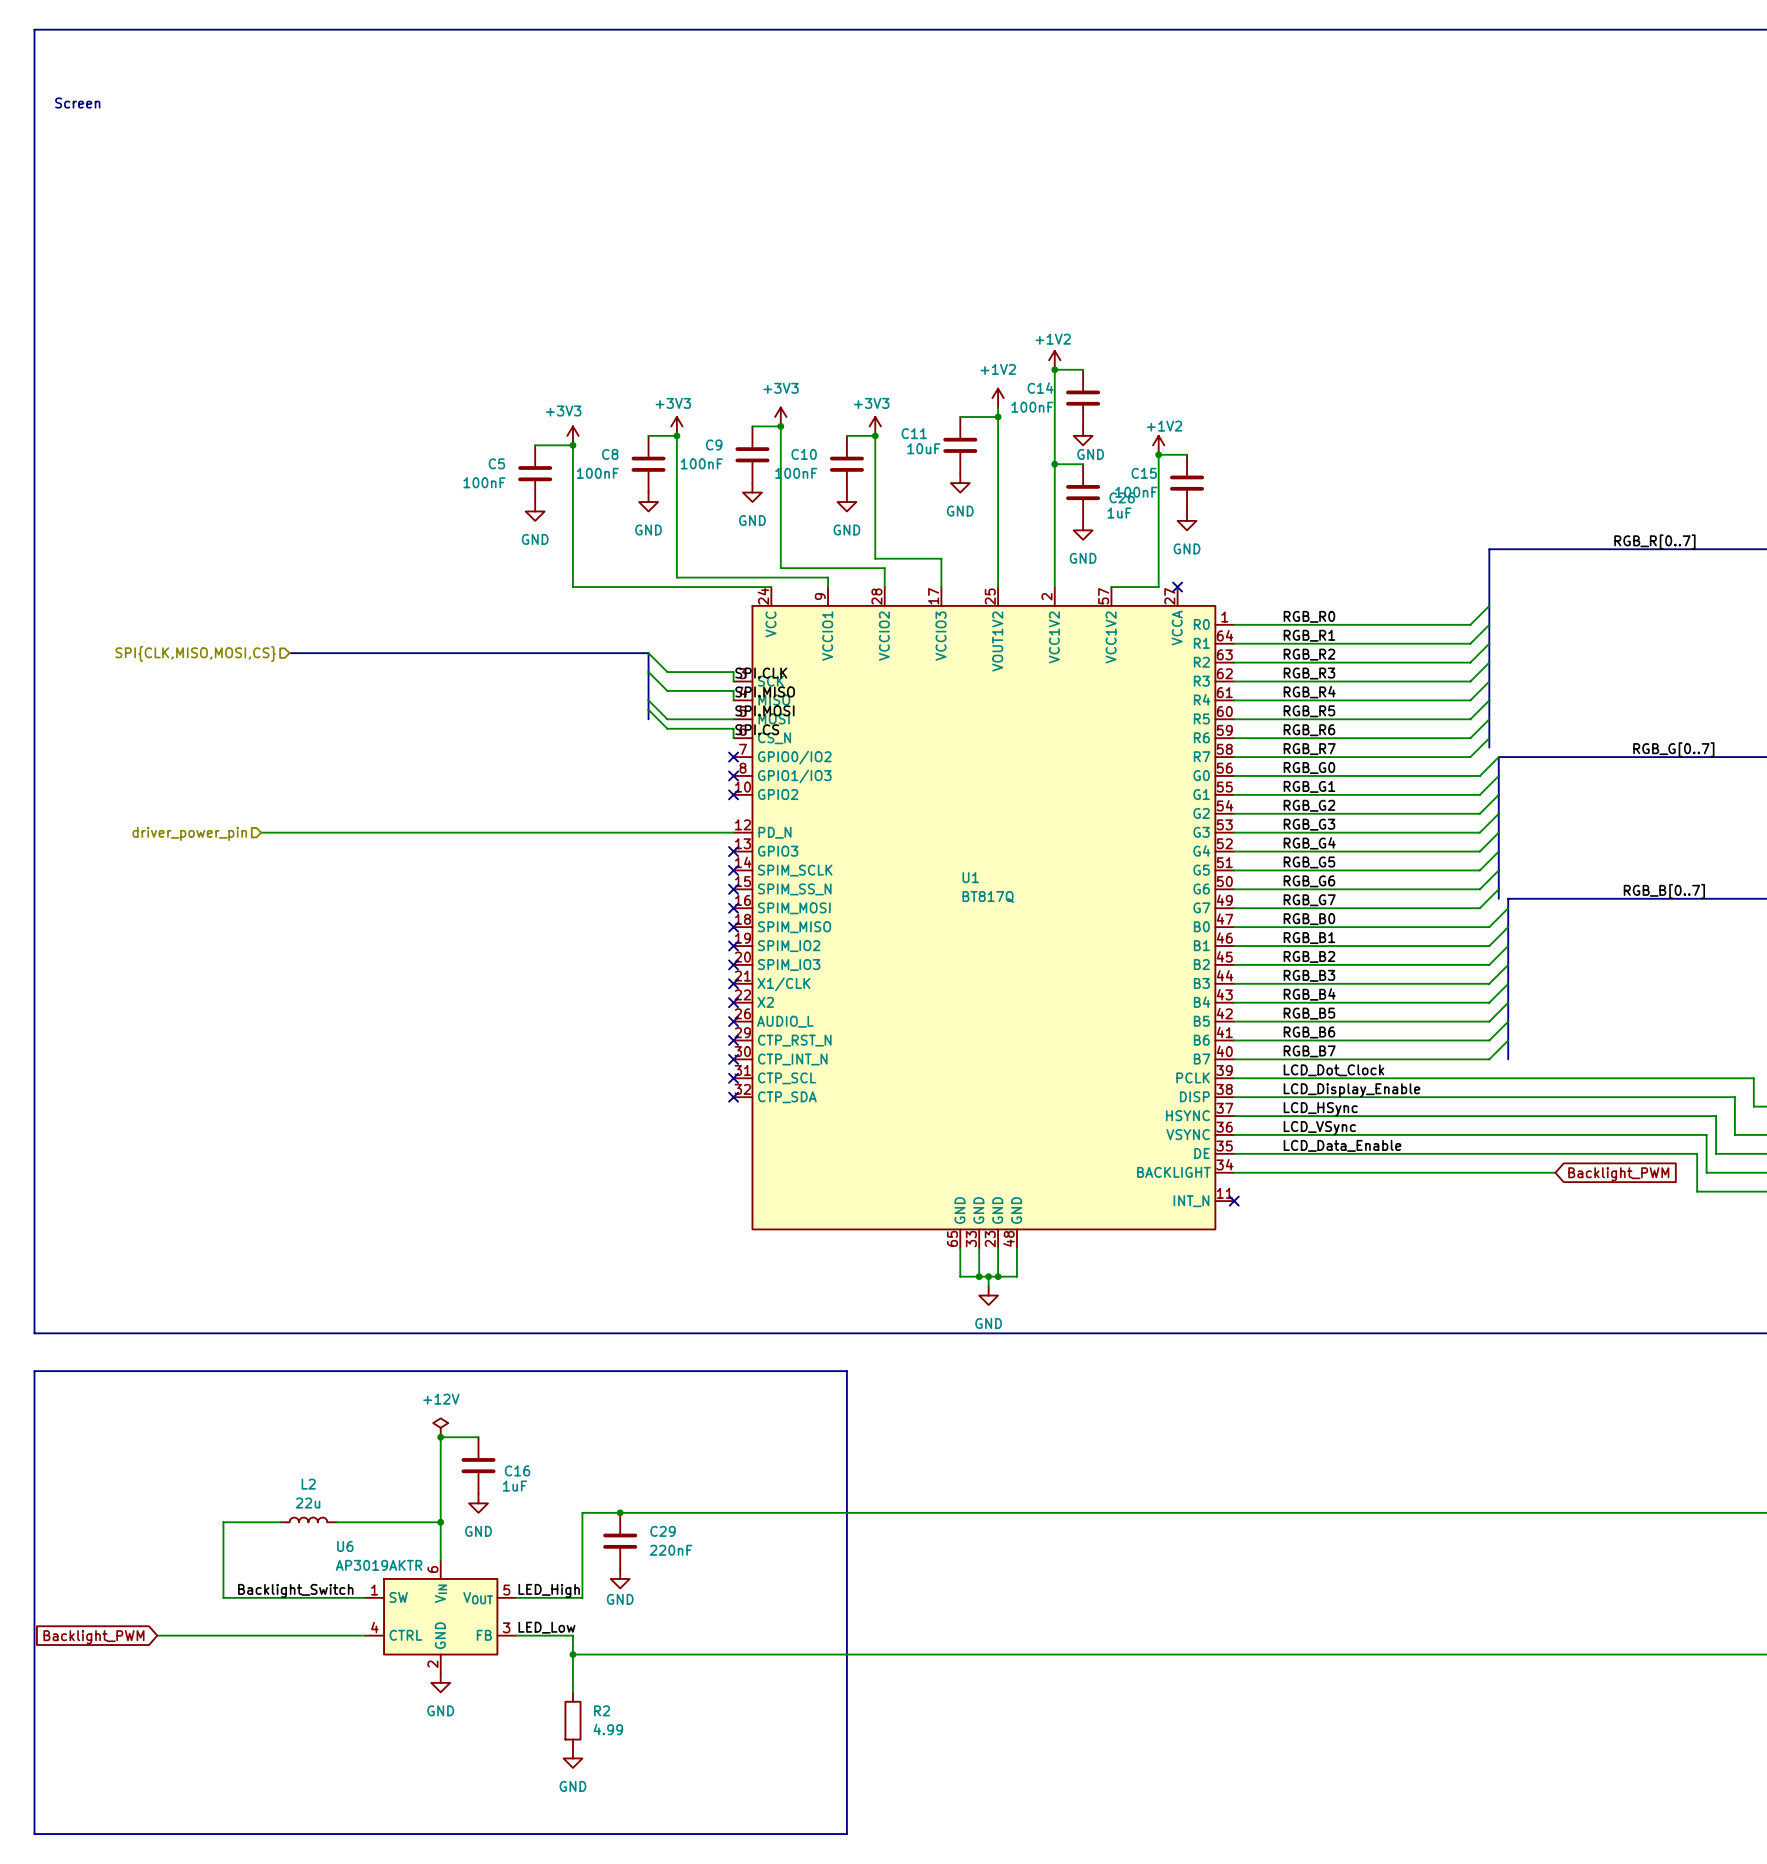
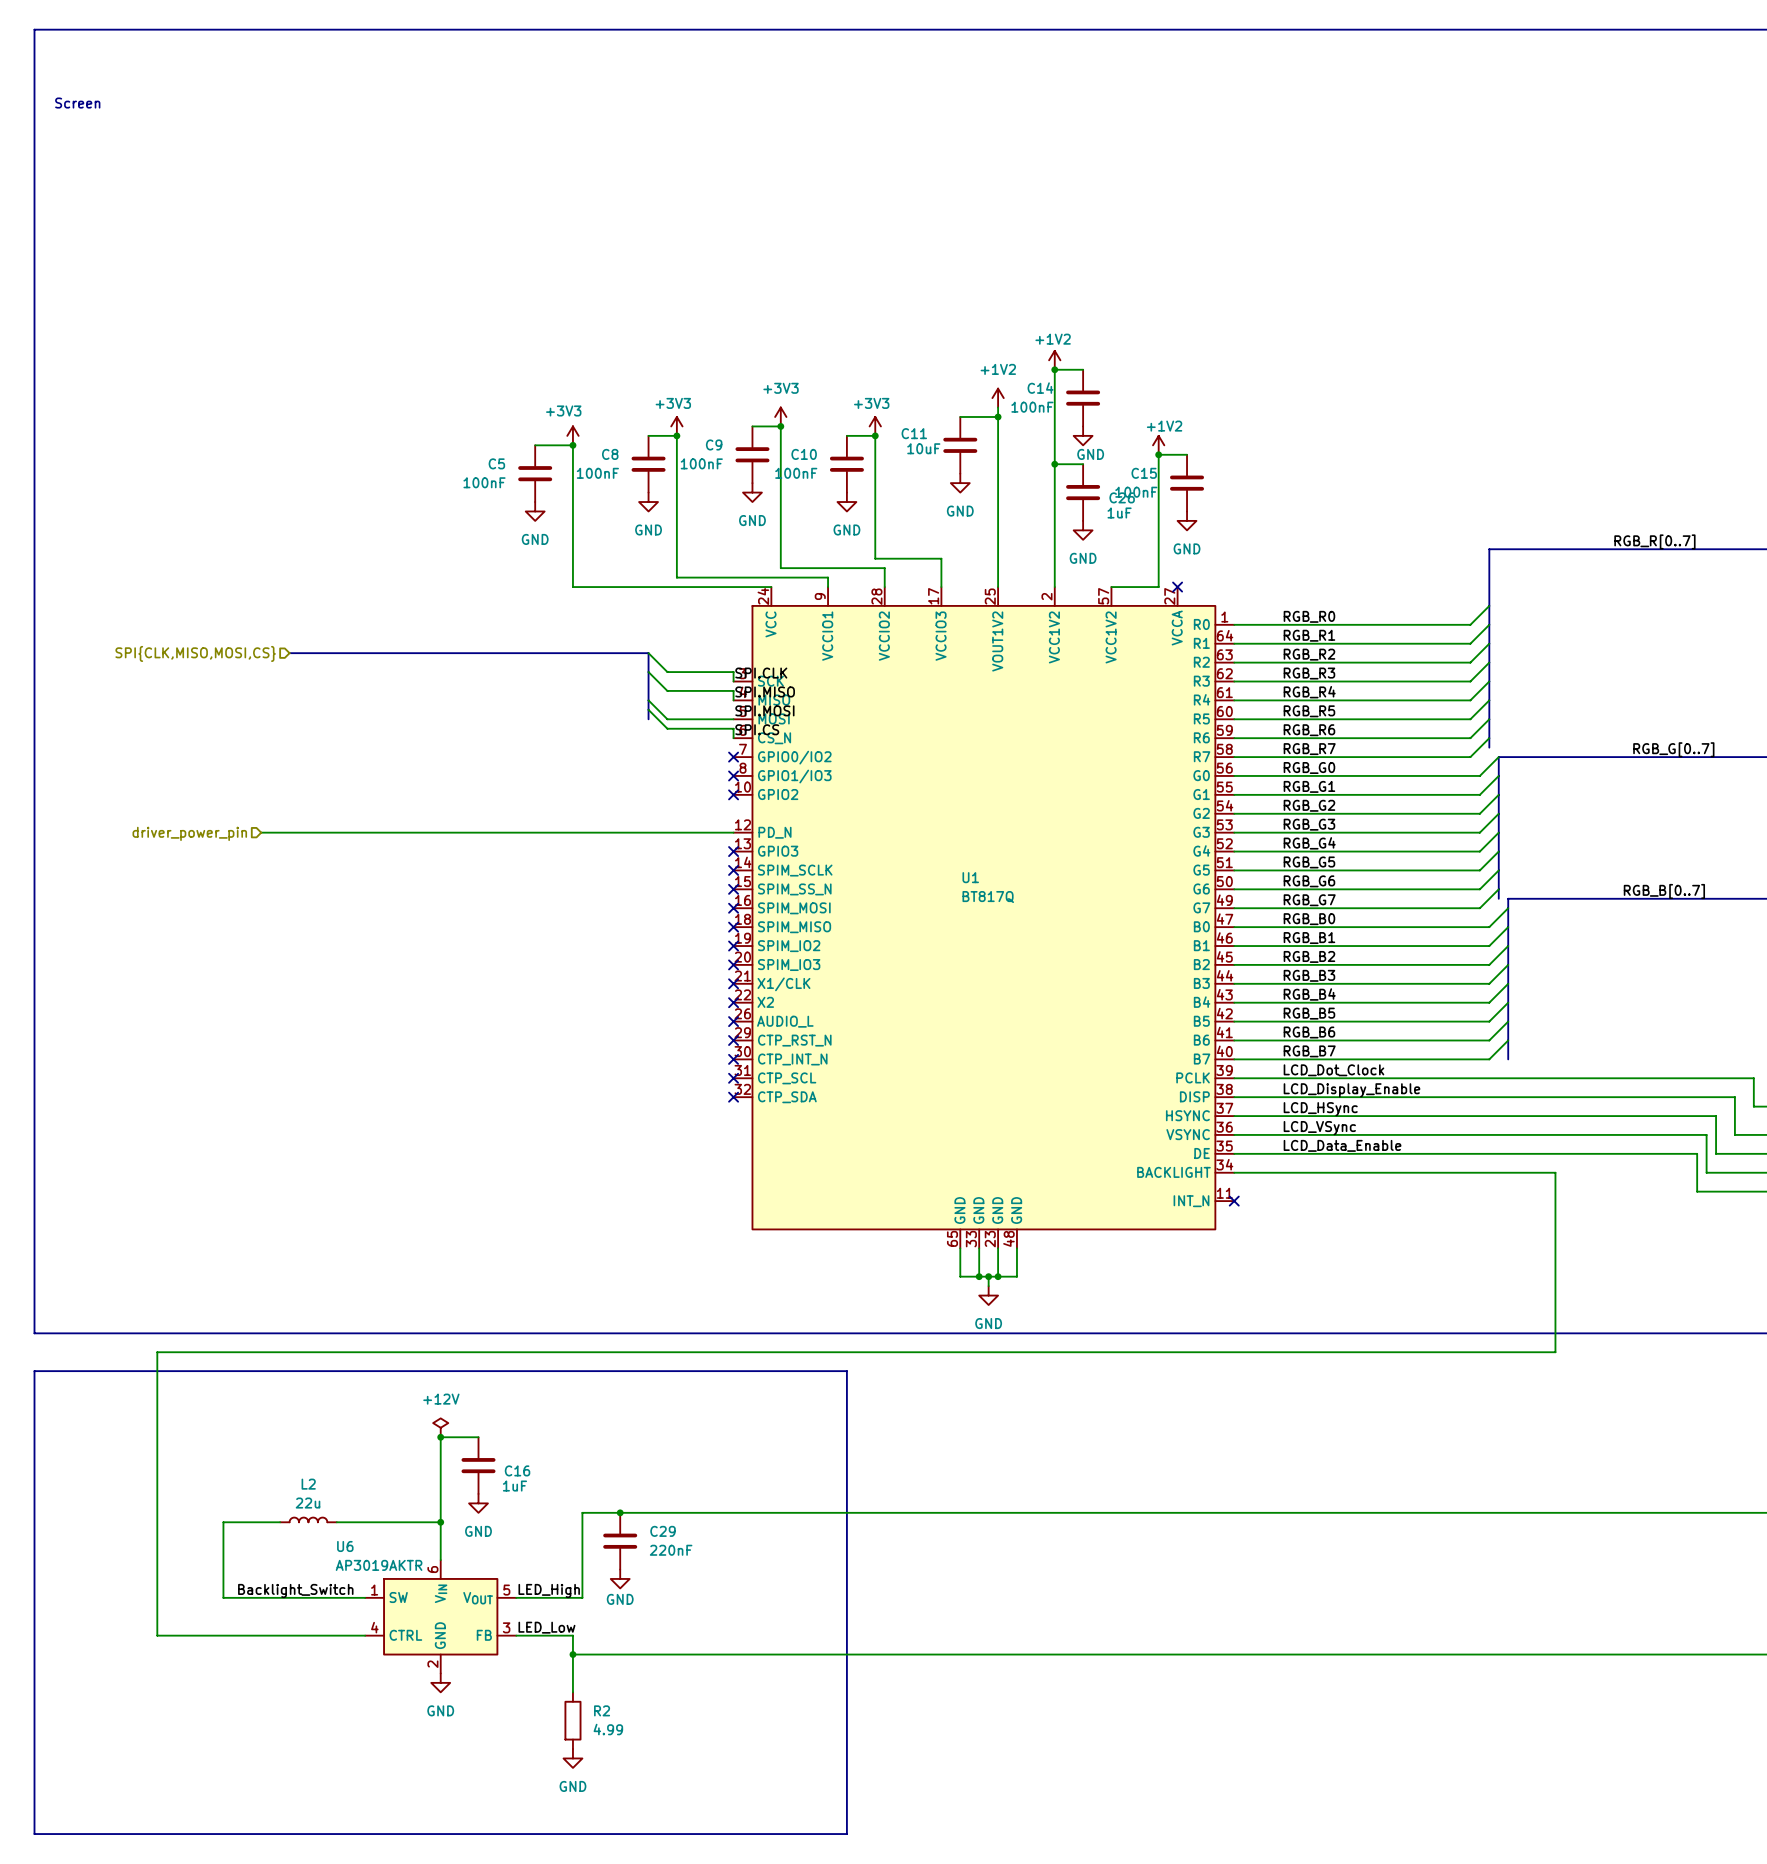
wire: none -> (1555, 1172) (1555, 1352) (157, 1352) (157, 1635)
global label: Backlight_PWM (1618, 1174) -> none
global label: Backlight_PWM (93, 1637) -> none

